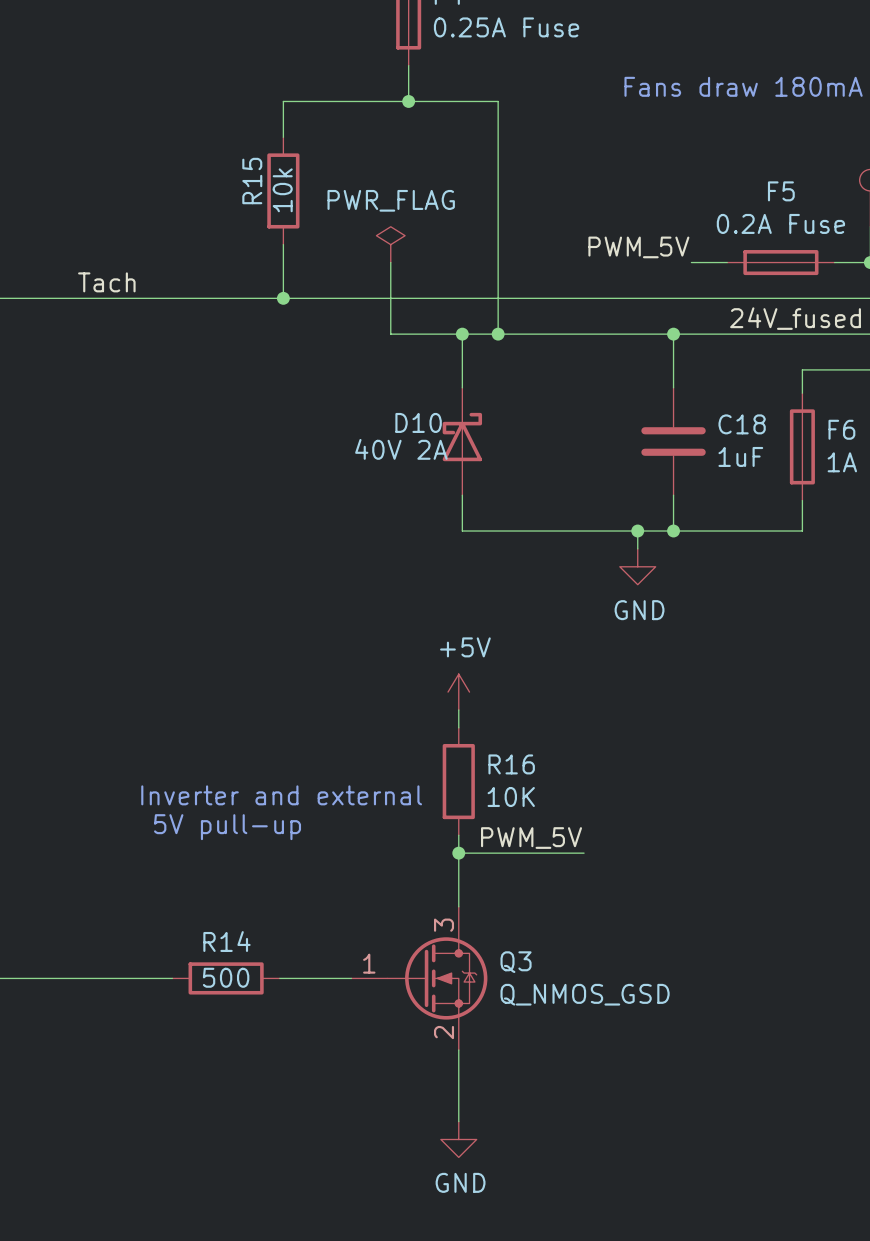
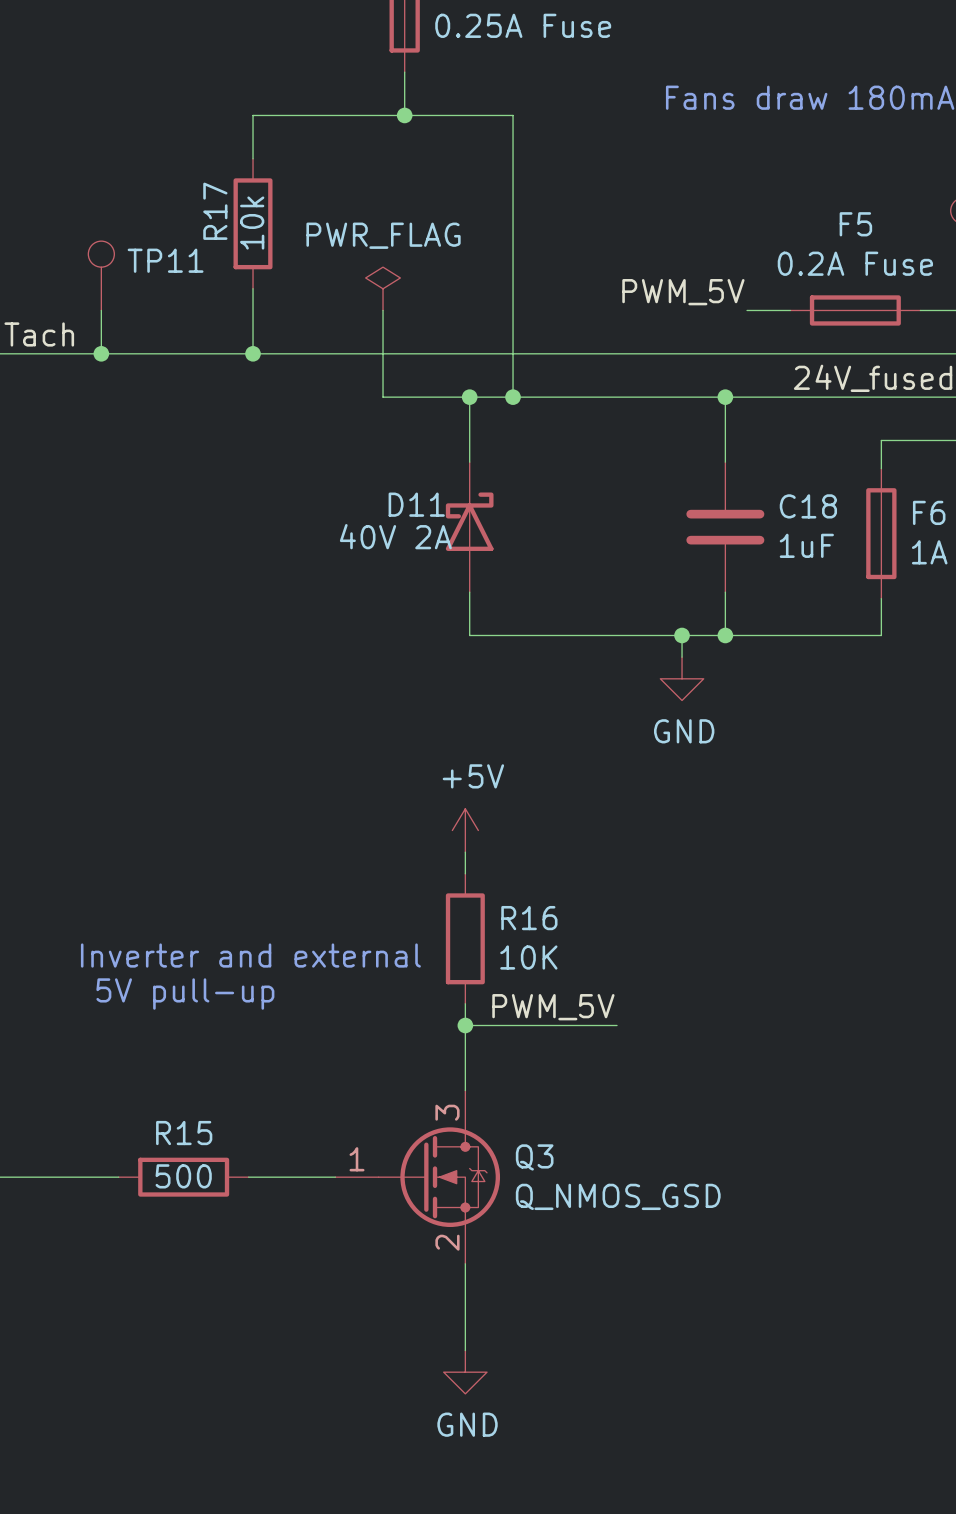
R15 name: R15 (252, 181) -> R17 (215, 211)
TP11: none -> (101, 275)
wire: none -> (101, 310) (101, 353)
junction: none -> (101, 353)
D10 name: D10 (418, 422) -> D11 (416, 504)
R14 name: R14 (226, 941) -> R15 (184, 1133)

